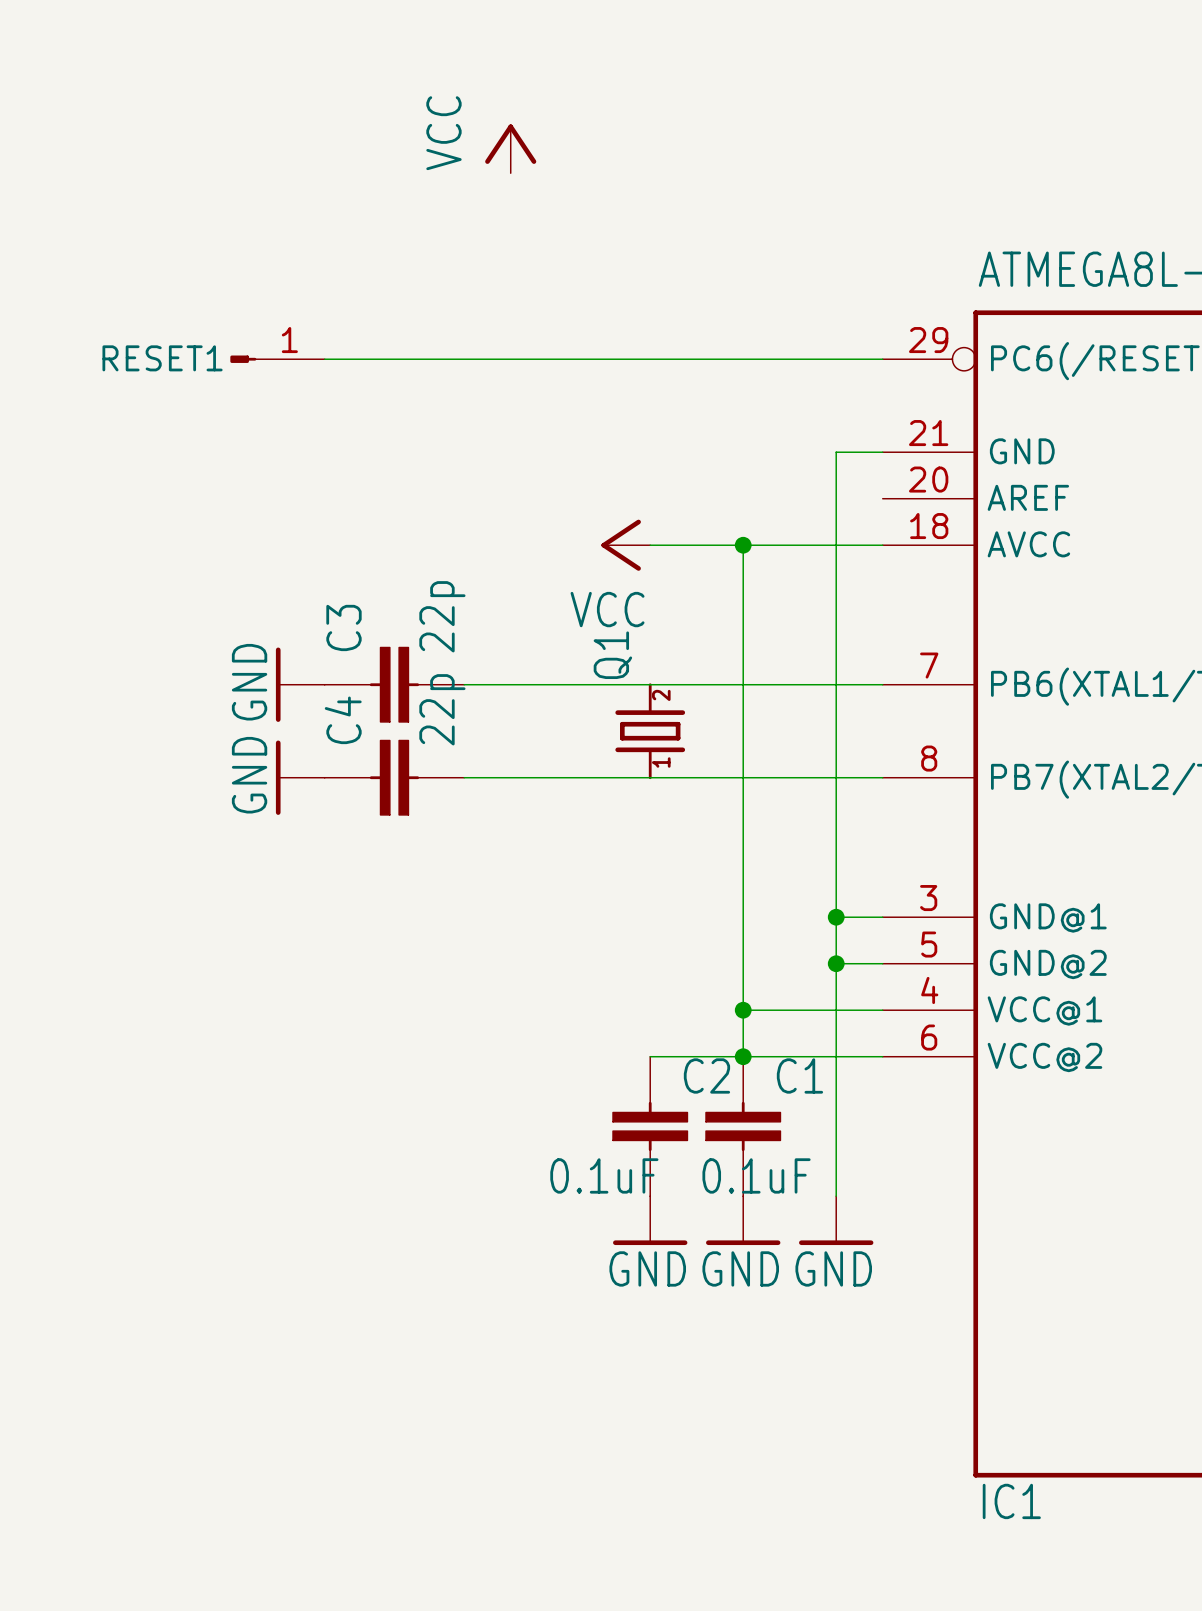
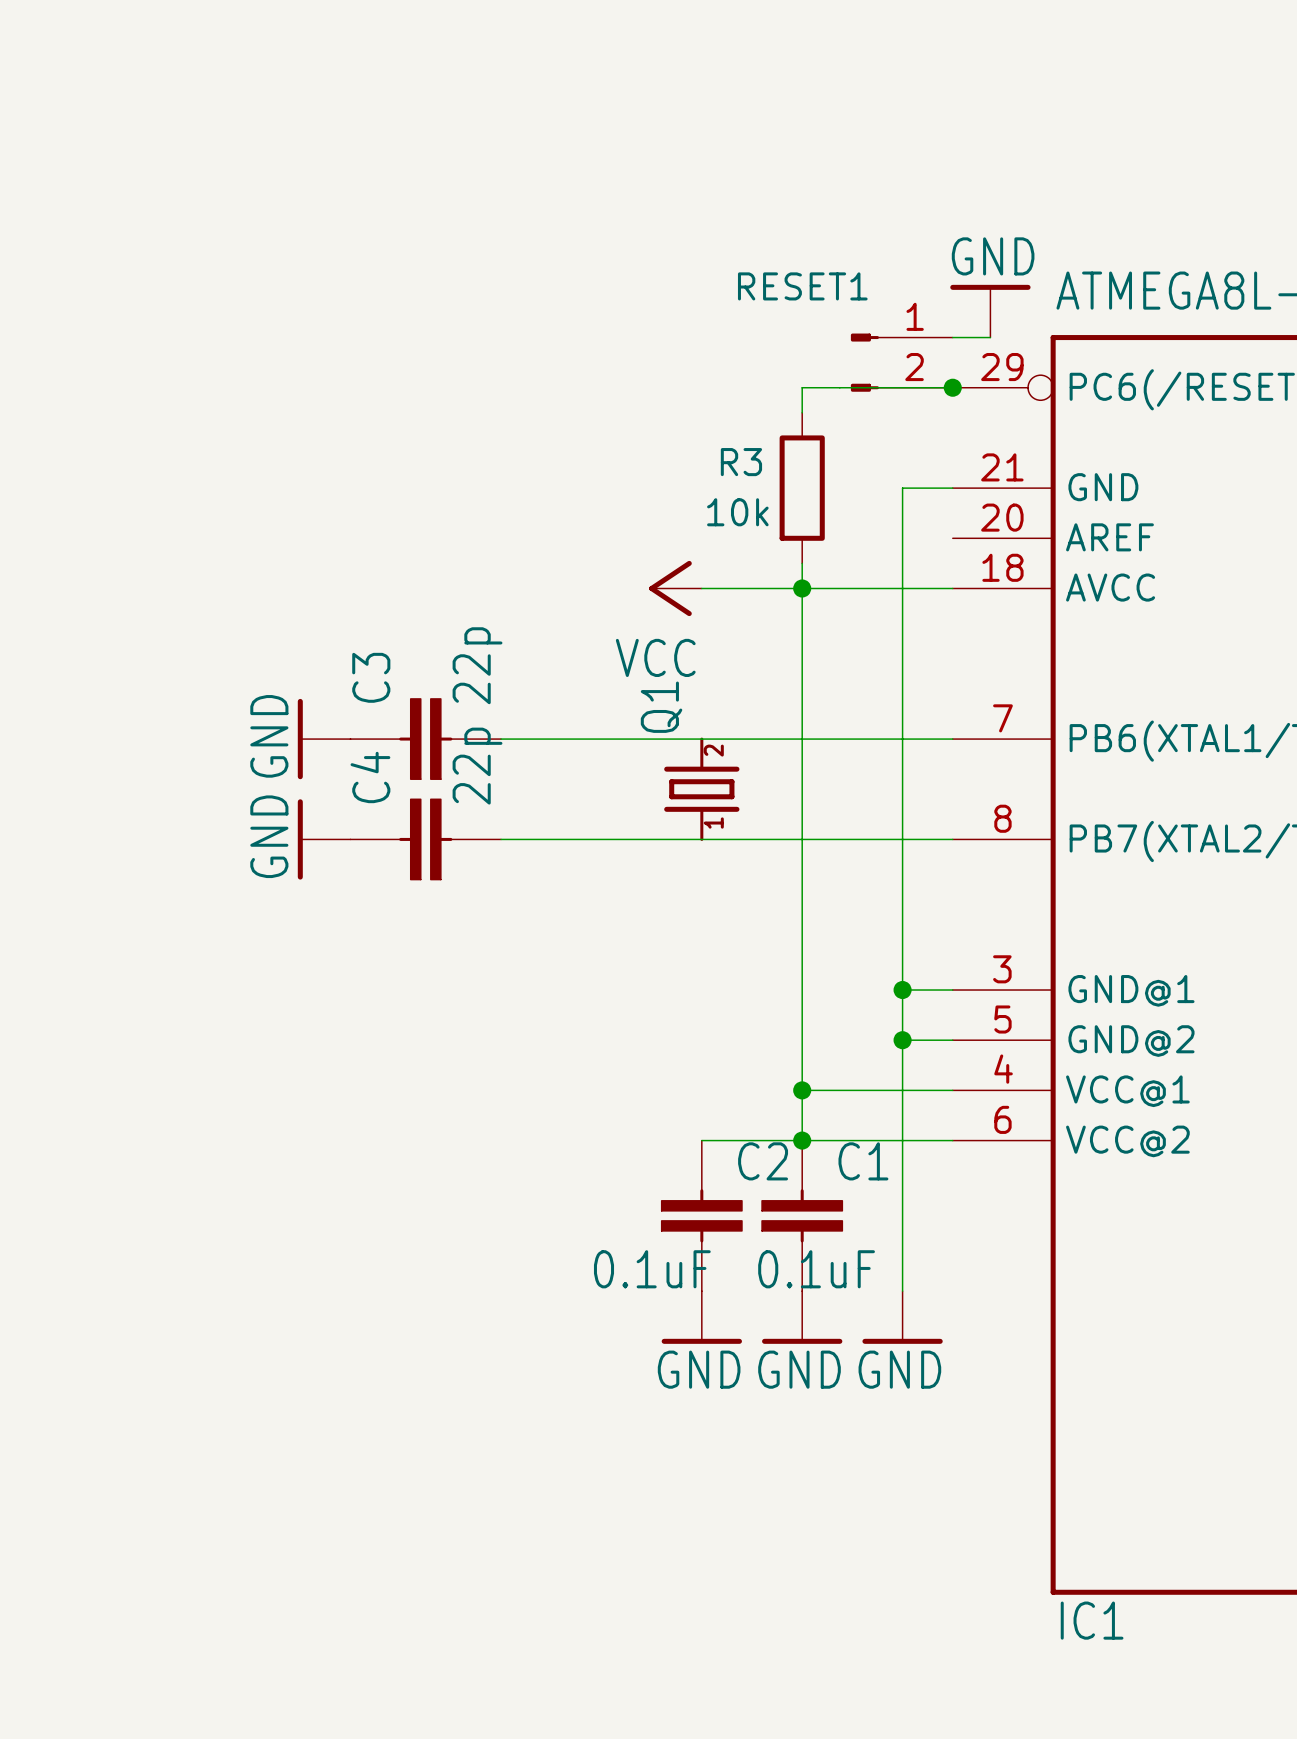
power symbol: VCC (510, 148) -> none
power symbol: none -> GND (990, 311)
wire: none -> (952, 337) (990, 337)
RESET1 symbol: [230, 355, 325, 363] -> [850, 333, 953, 392]
RESET1 name position: RESET1 (162, 358) -> RESET1 (802, 286)
wire: (324, 359) (743, 359) -> (802, 412) (802, 387)
junction: none -> (952, 387)
R3: none -> 10k (802, 488)
wire: none -> (802, 563) (802, 588)

